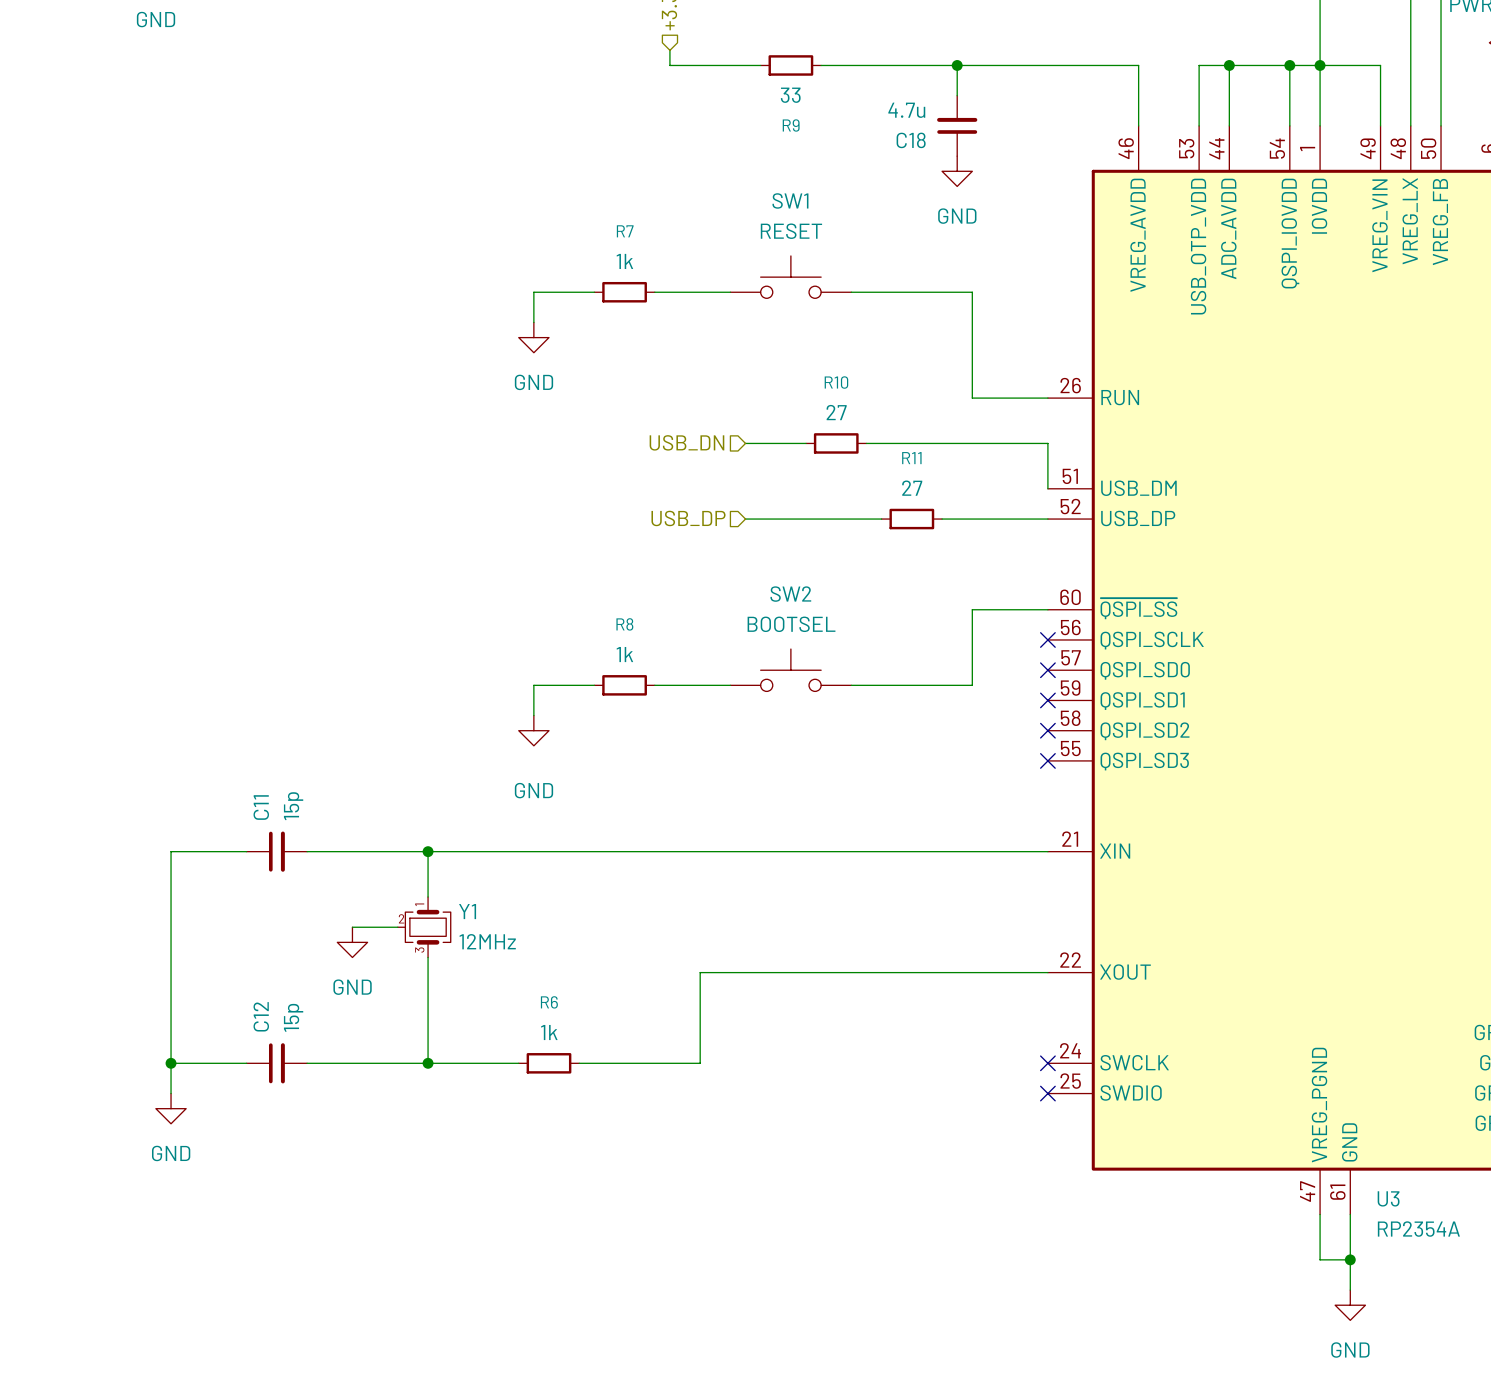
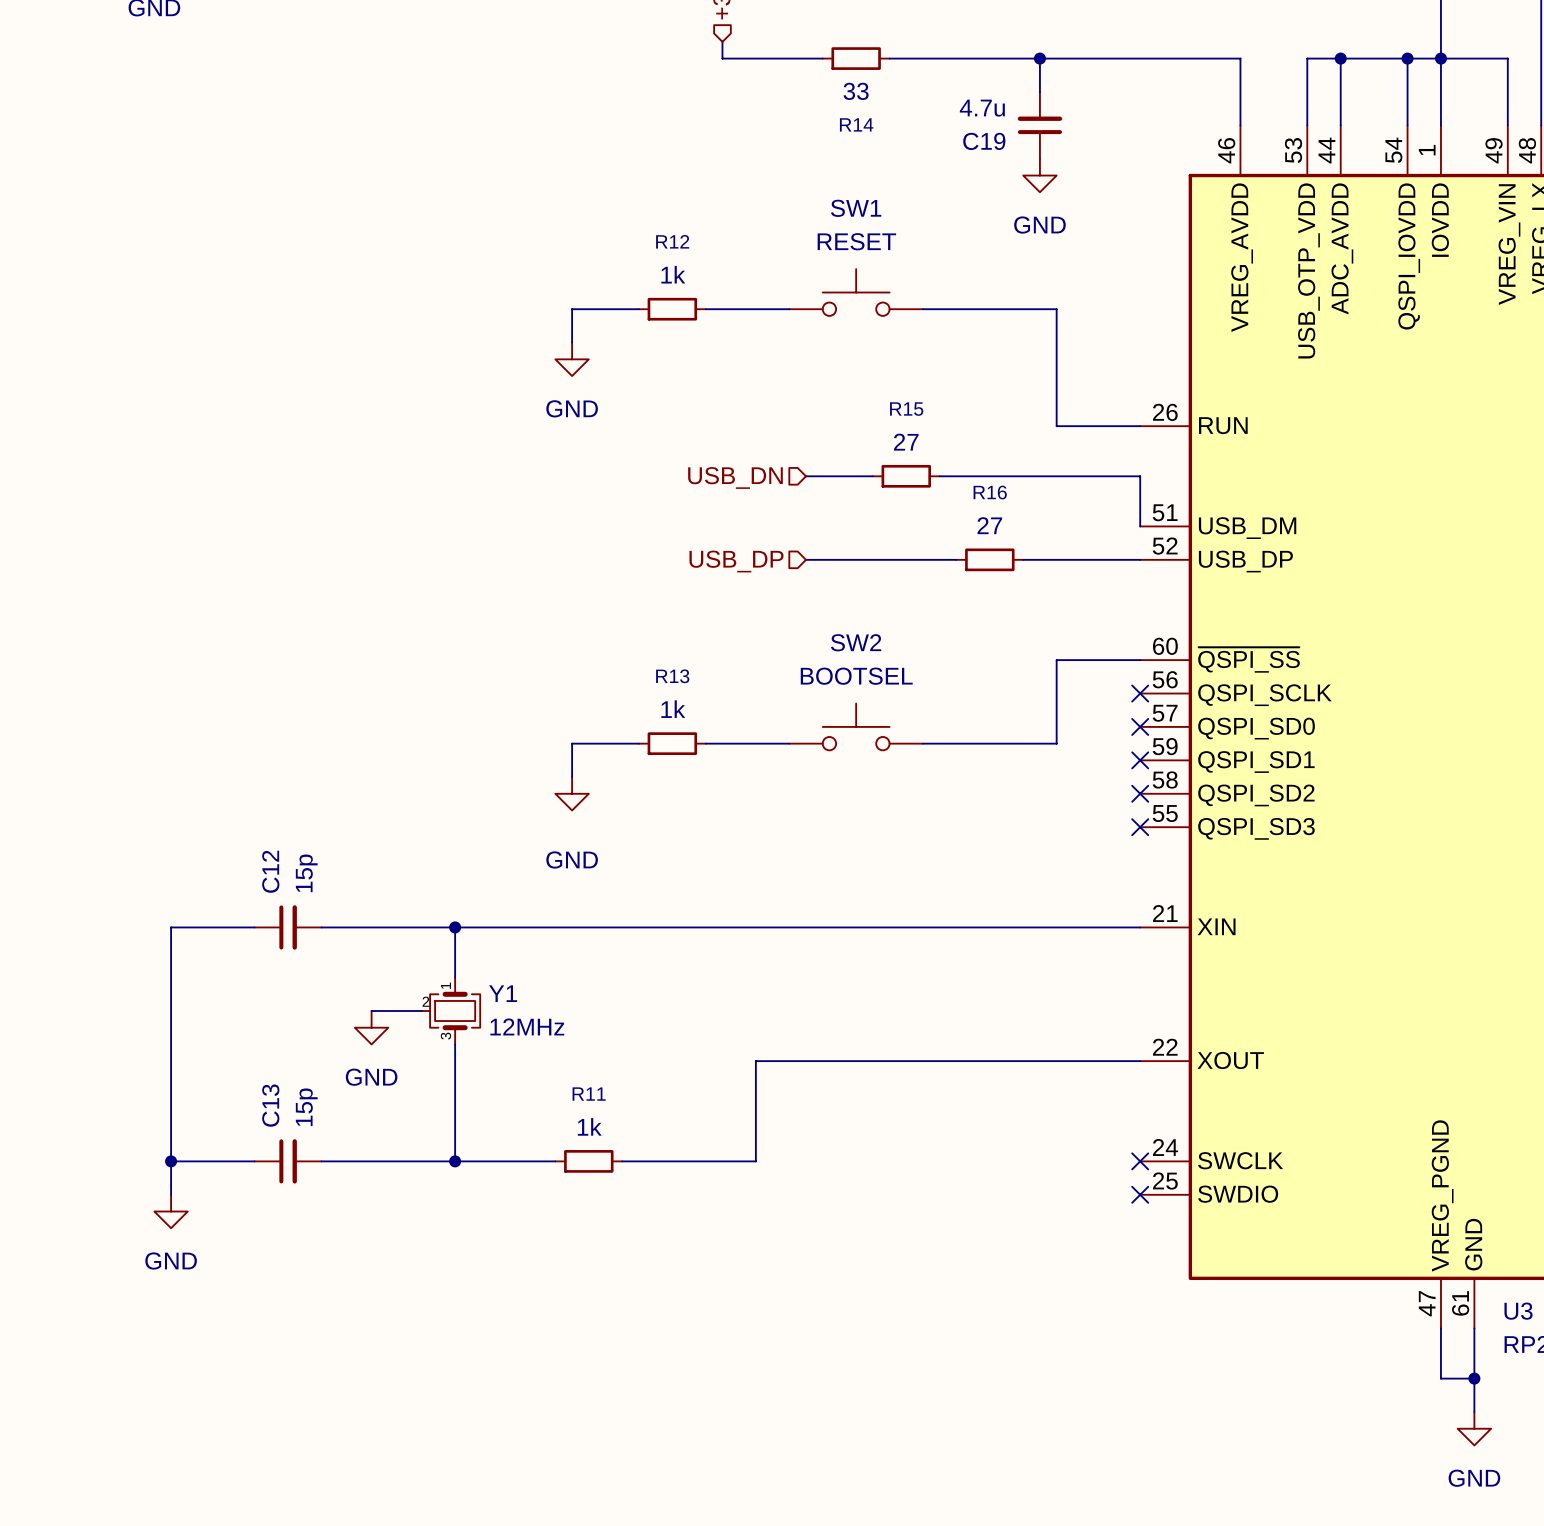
R9 name: R9 (791, 125) -> R14 (856, 124)
C18 name: C18 (911, 140) -> C19 (984, 141)
R7 name: R7 (625, 231) -> R12 (672, 241)
R10 name: R10 (836, 382) -> R15 (906, 409)
R11 name: R11 (911, 458) -> R16 (990, 492)
R8 name: R8 (624, 624) -> R13 (672, 676)
C11 name: C11 (261, 807) -> C12 (270, 871)
R6 name: R6 (549, 1002) -> R11 (589, 1094)
C12 name: C12 (261, 1016) -> C13 (270, 1105)

